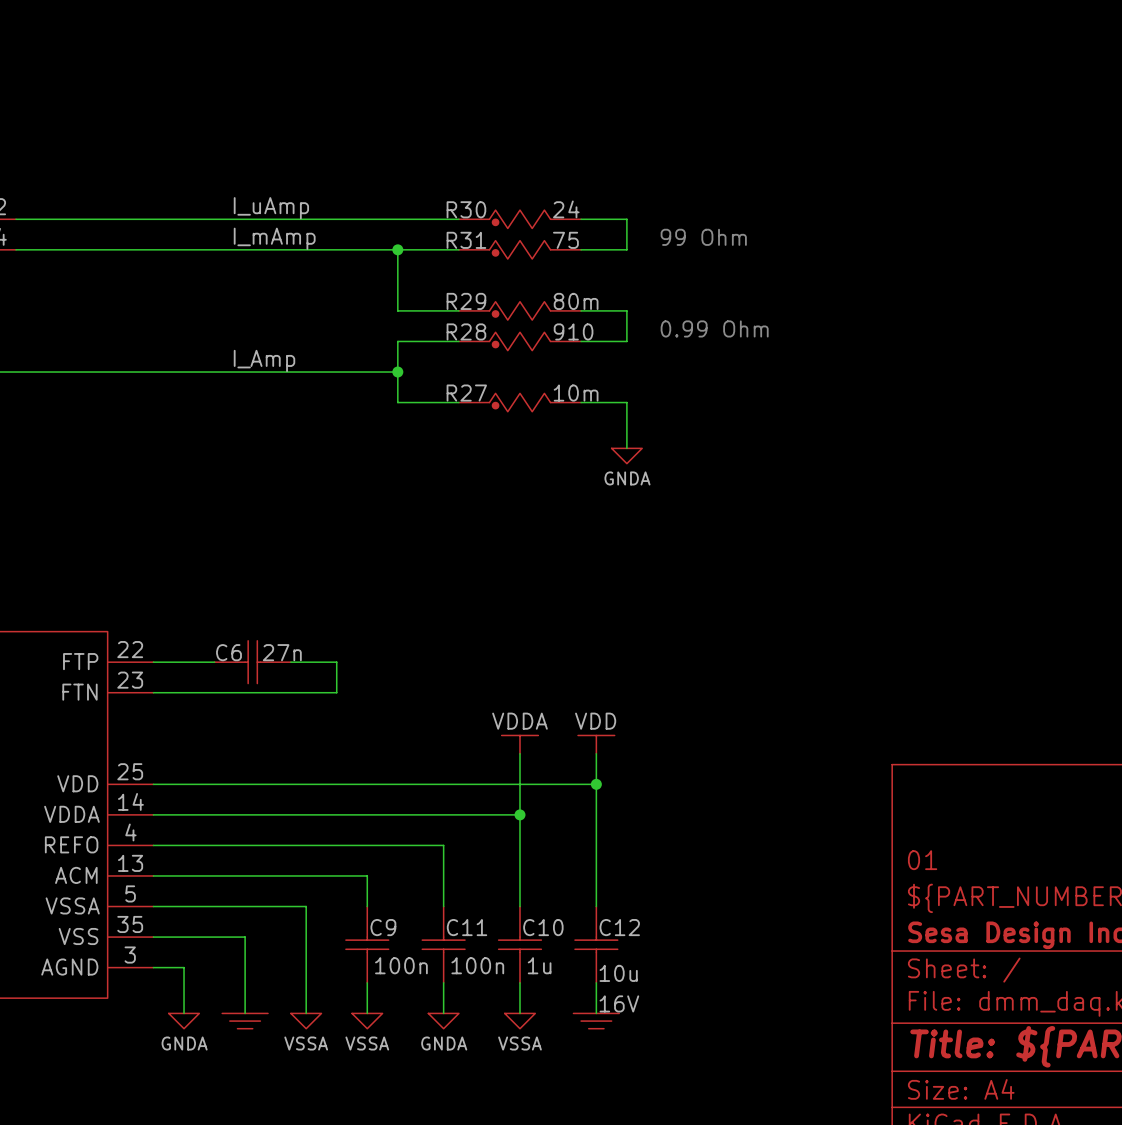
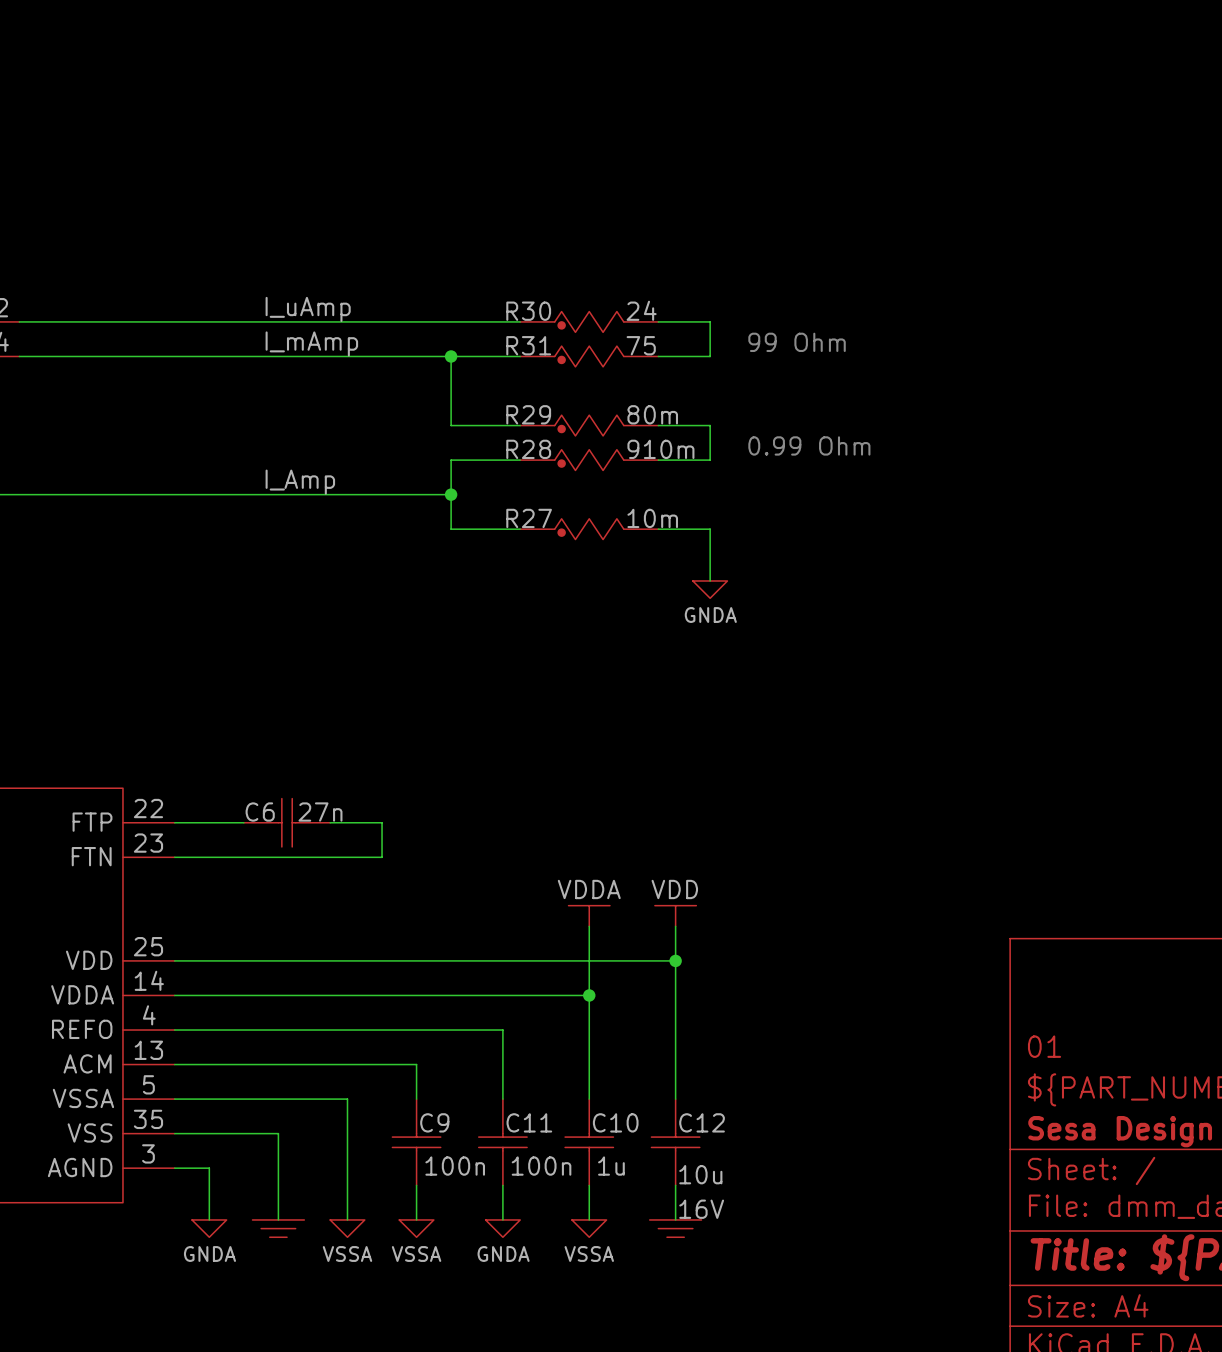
R28 value: 910 (573, 331) -> 910m (660, 449)

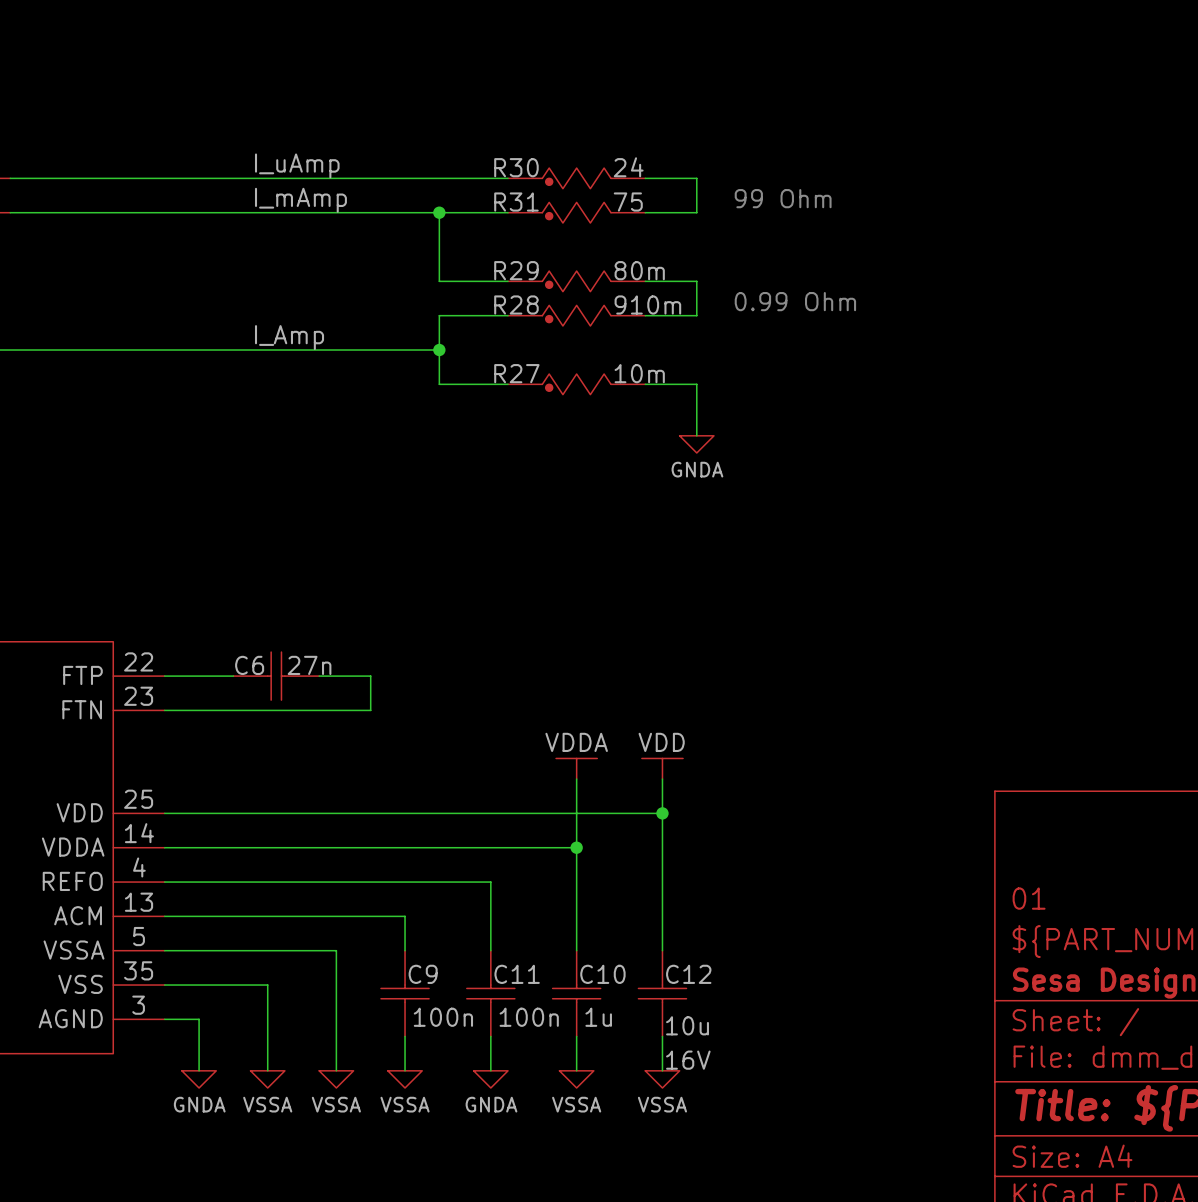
power symbol shape: [252, 1219, 305, 1238] -> [250, 1070, 285, 1088]
power symbol shape: [649, 1219, 702, 1238] -> [645, 1070, 680, 1088]
power symbol text: none -> VSSA (267, 1104)
power symbol text: none -> VSSA (662, 1104)

